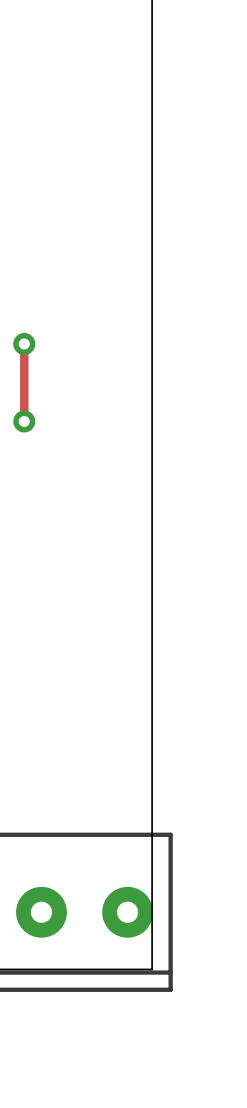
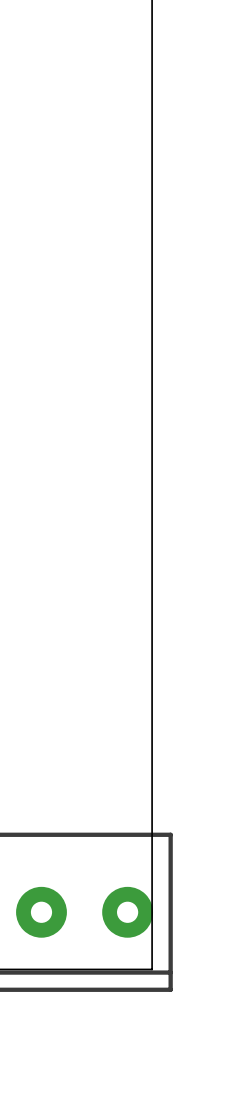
track: (24, 343) (24, 421) -> none
via: (24, 343) -> none
via: (24, 421) -> none

